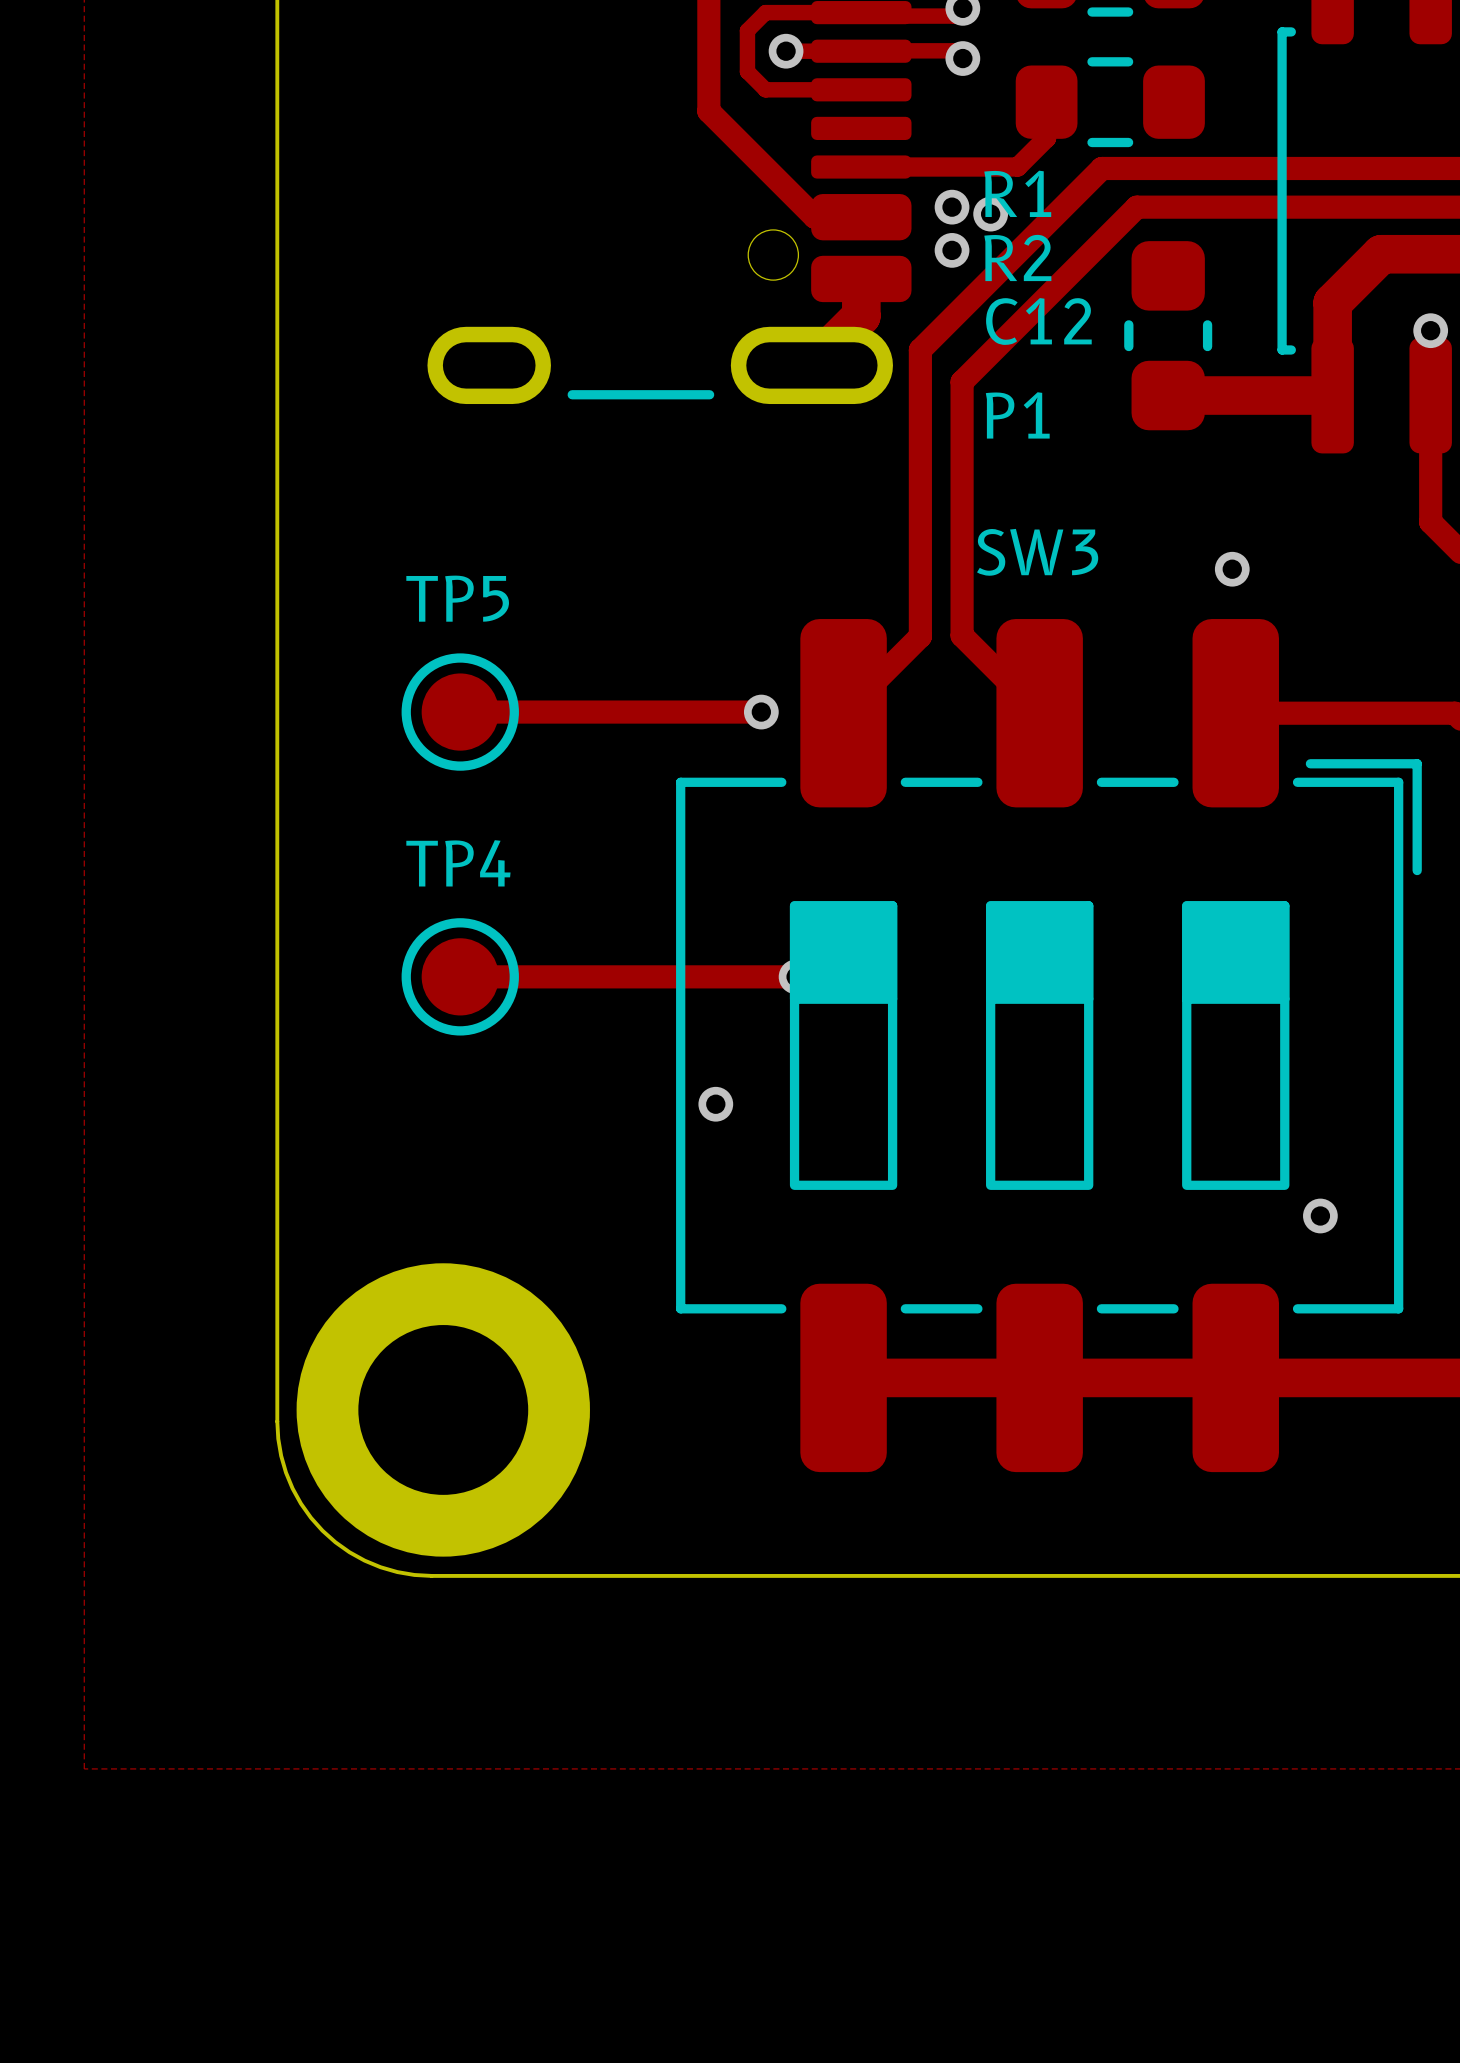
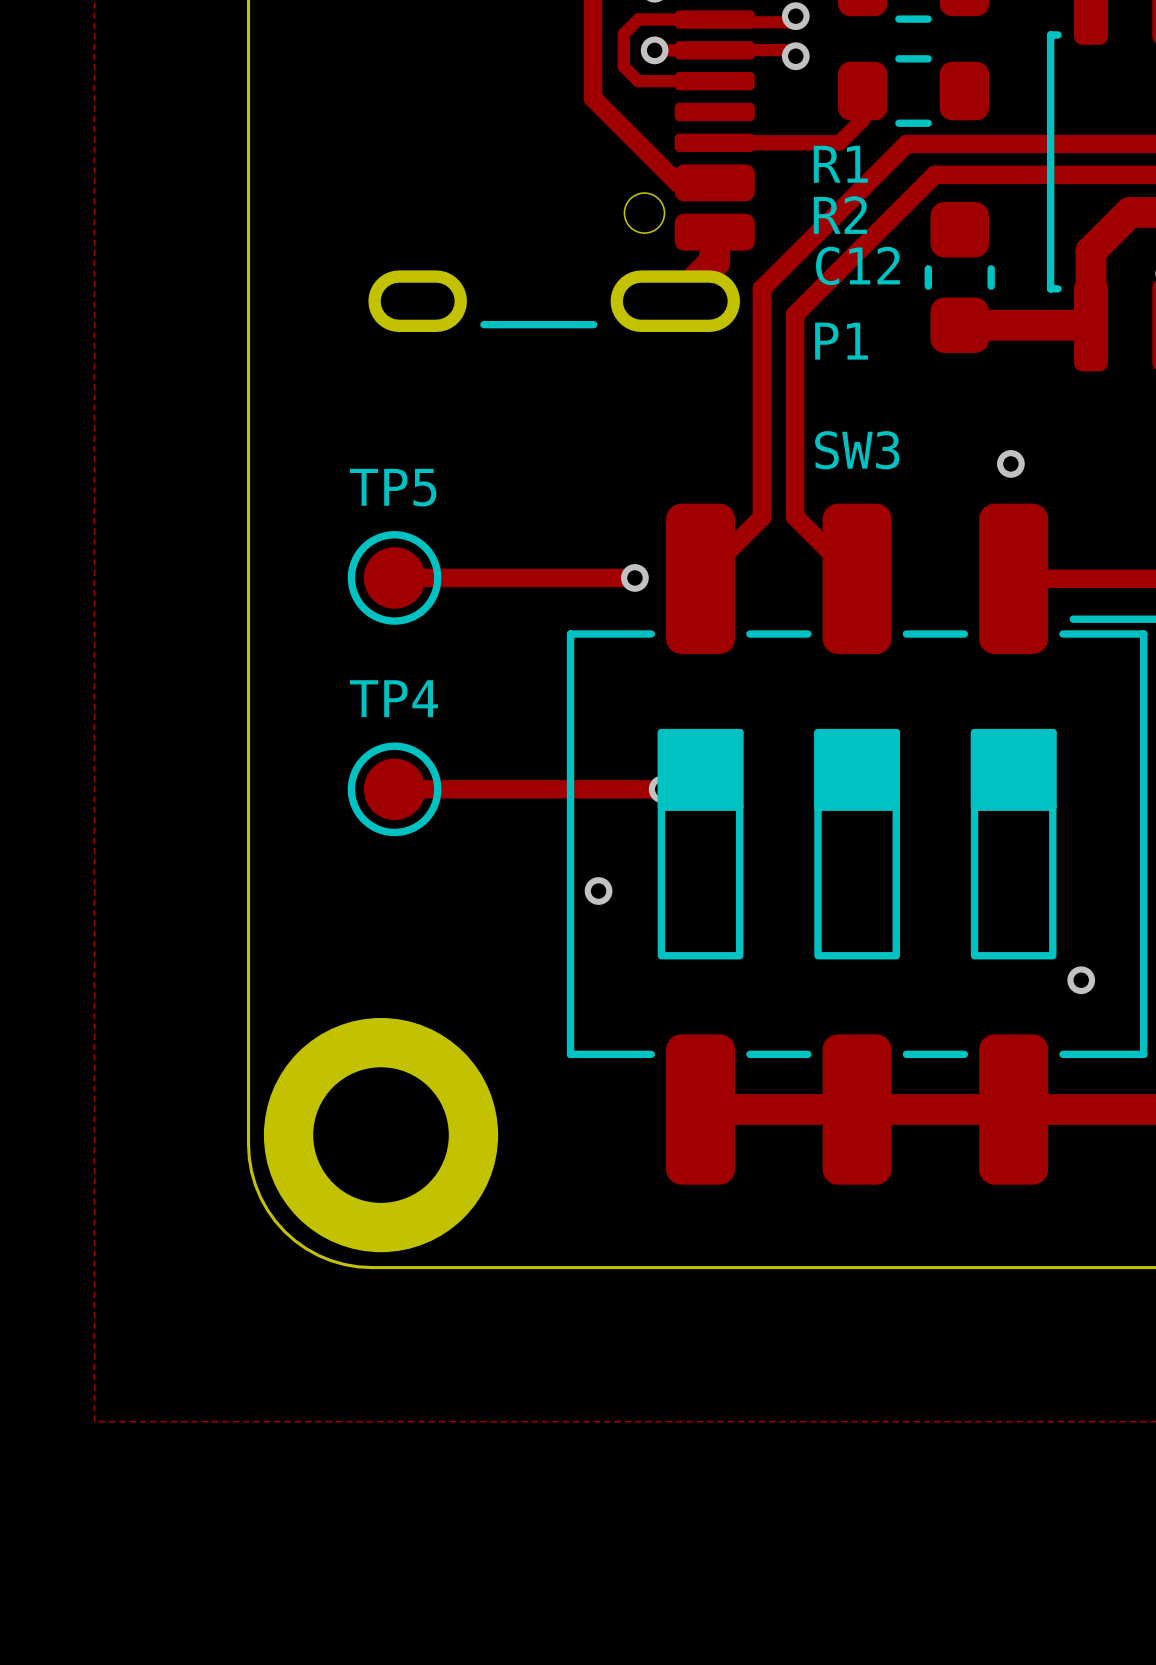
via: (952, 207) -> none
via: (990, 214) -> none
via: (952, 250) -> none

